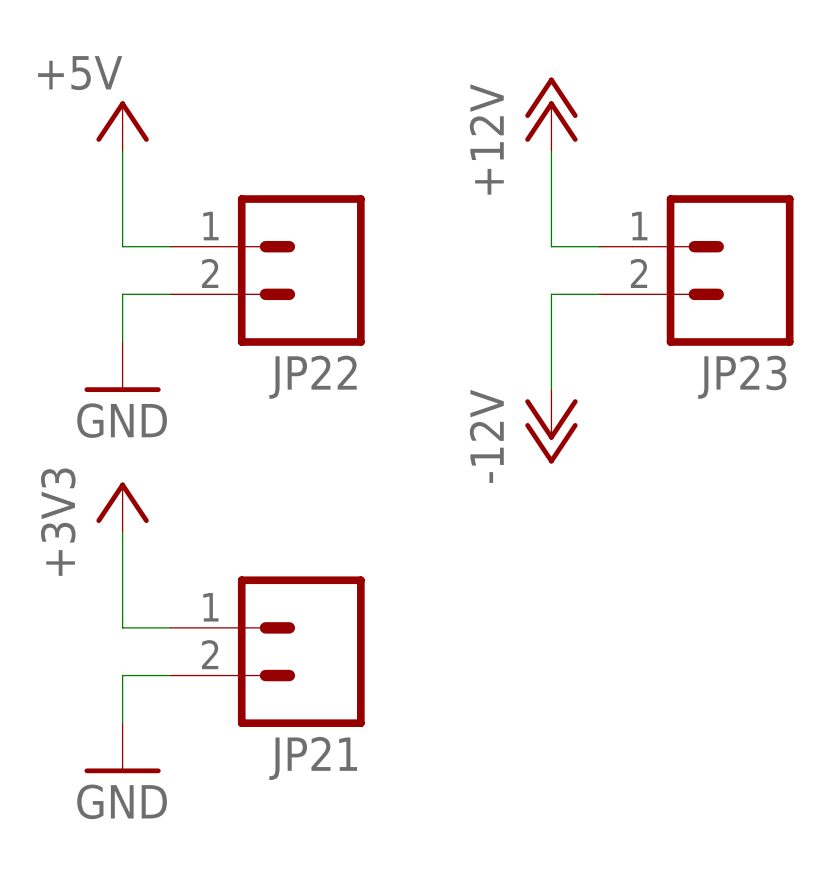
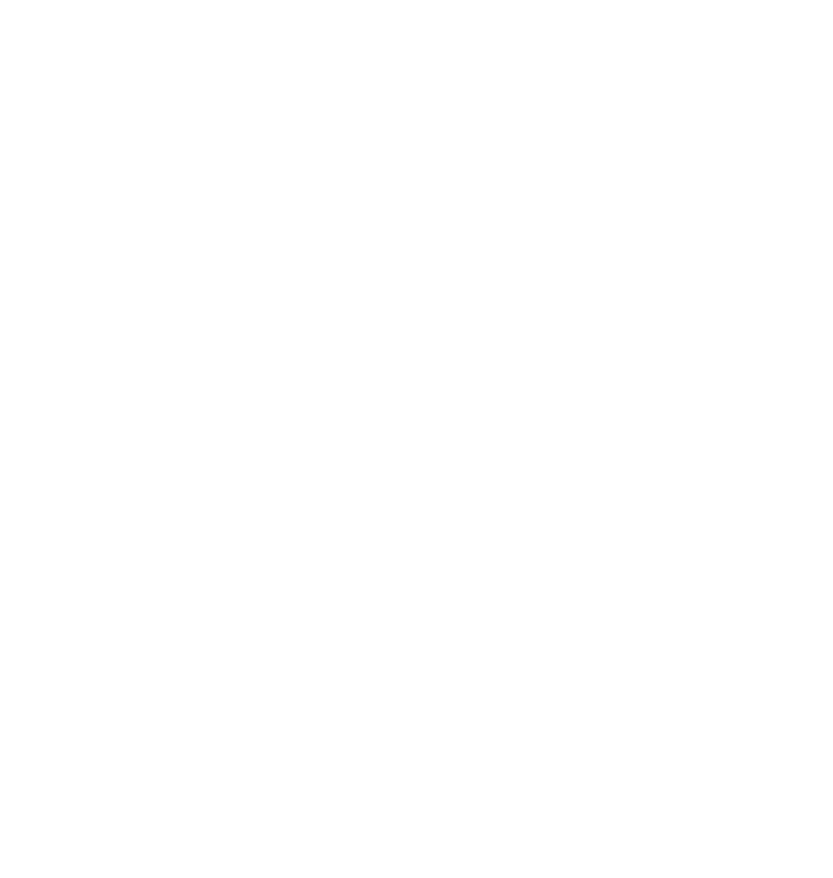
power symbol: +12V (551, 114) -> none
power symbol: +5V (122, 126) -> none
wire: (122, 151) (122, 246) (170, 246) -> none
wire: (551, 151) (551, 246) (599, 246) -> none
JP22: (267, 270) -> none
JP23: (696, 270) -> none
wire: (170, 294) (122, 294) (122, 341) -> none
wire: (599, 294) (551, 294) (551, 389) -> none
power symbol: GND (122, 367) -> none
power symbol: -12V (551, 426) -> none
power symbol: +3V3 (122, 507) -> none
wire: (122, 532) (122, 627) (170, 627) -> none
JP21: (267, 651) -> none
wire: (170, 675) (122, 675) (122, 723) -> none
power symbol: GND (122, 748) -> none

